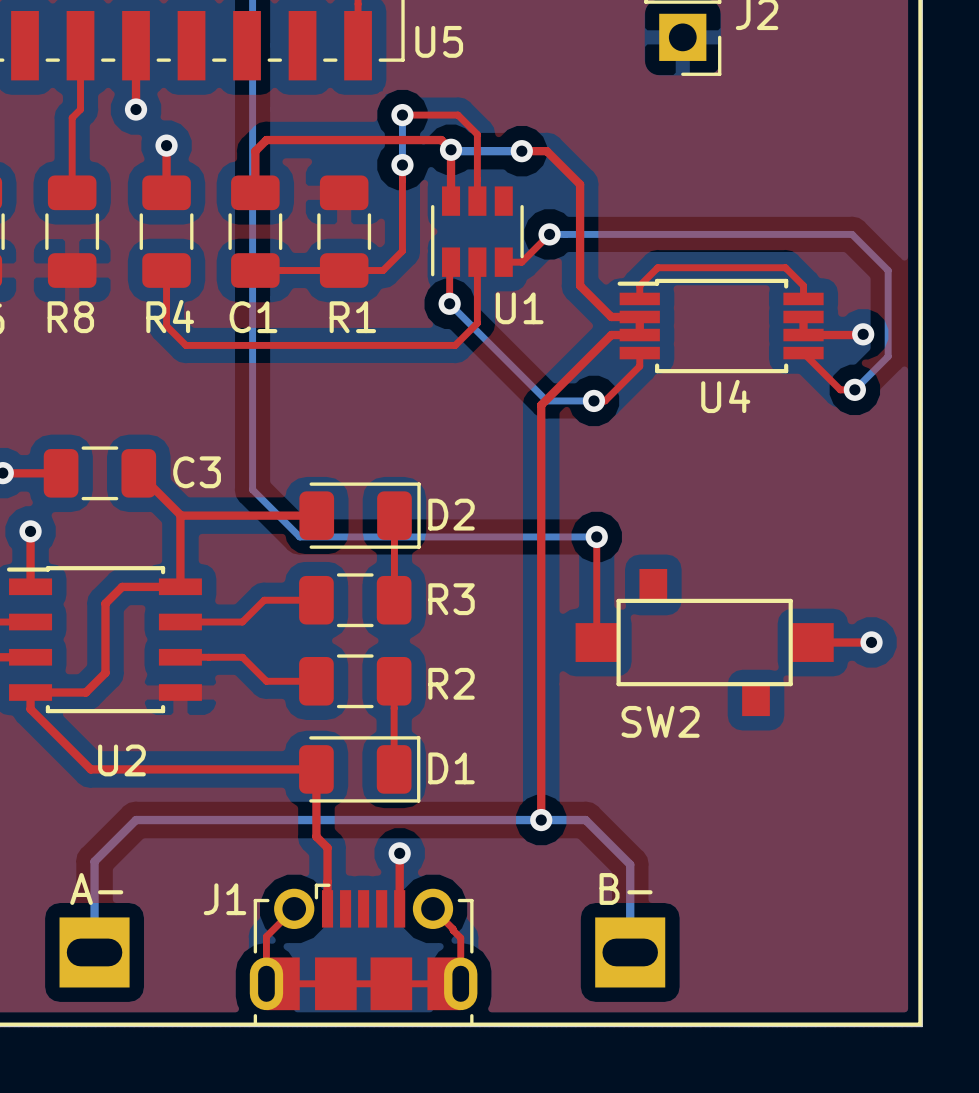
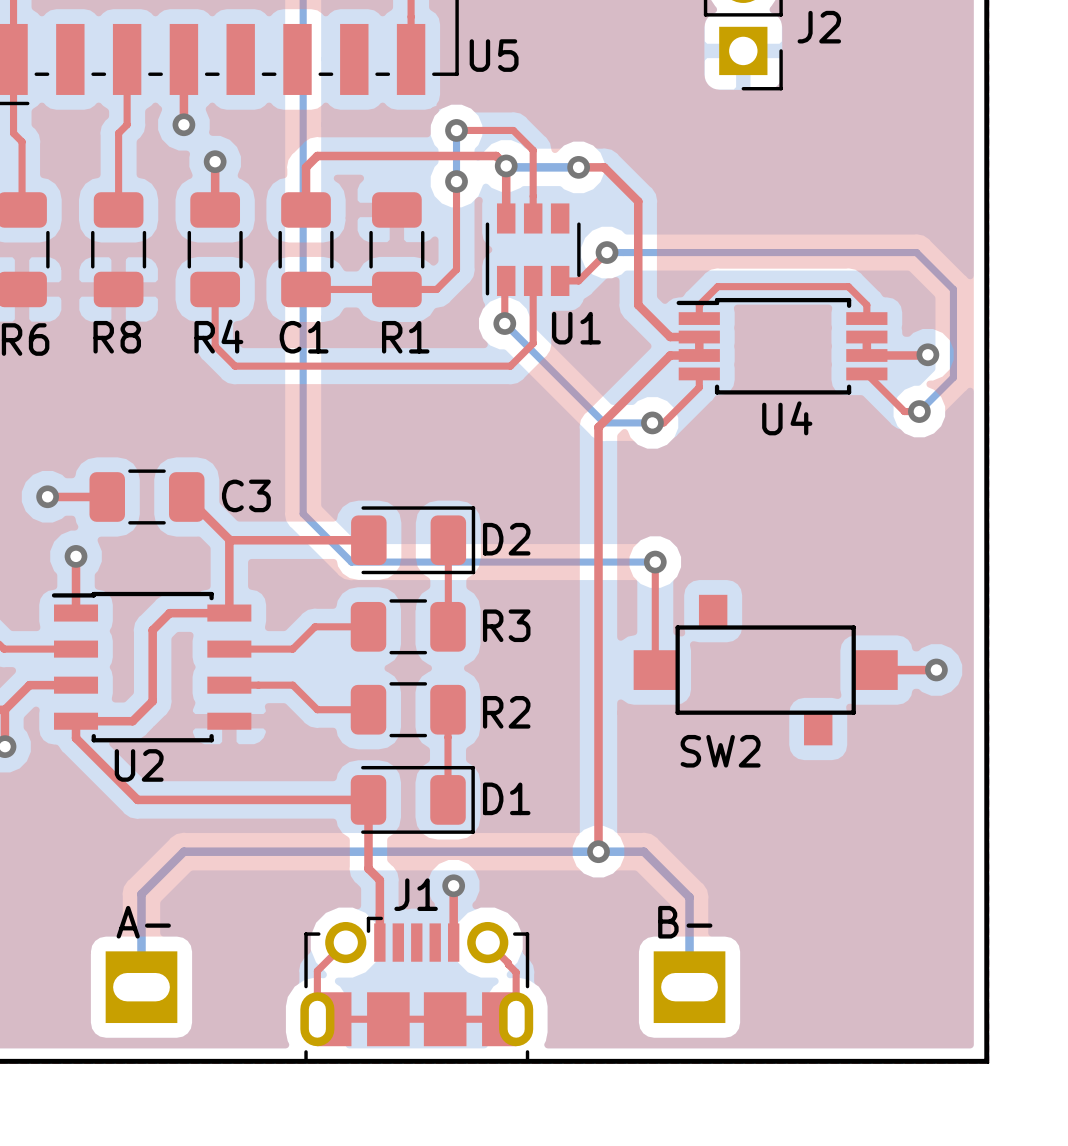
U2 name position: U2 (121, 760) -> U2 (139, 765)
J1 name position: J1 (225, 899) -> J1 (416, 894)

